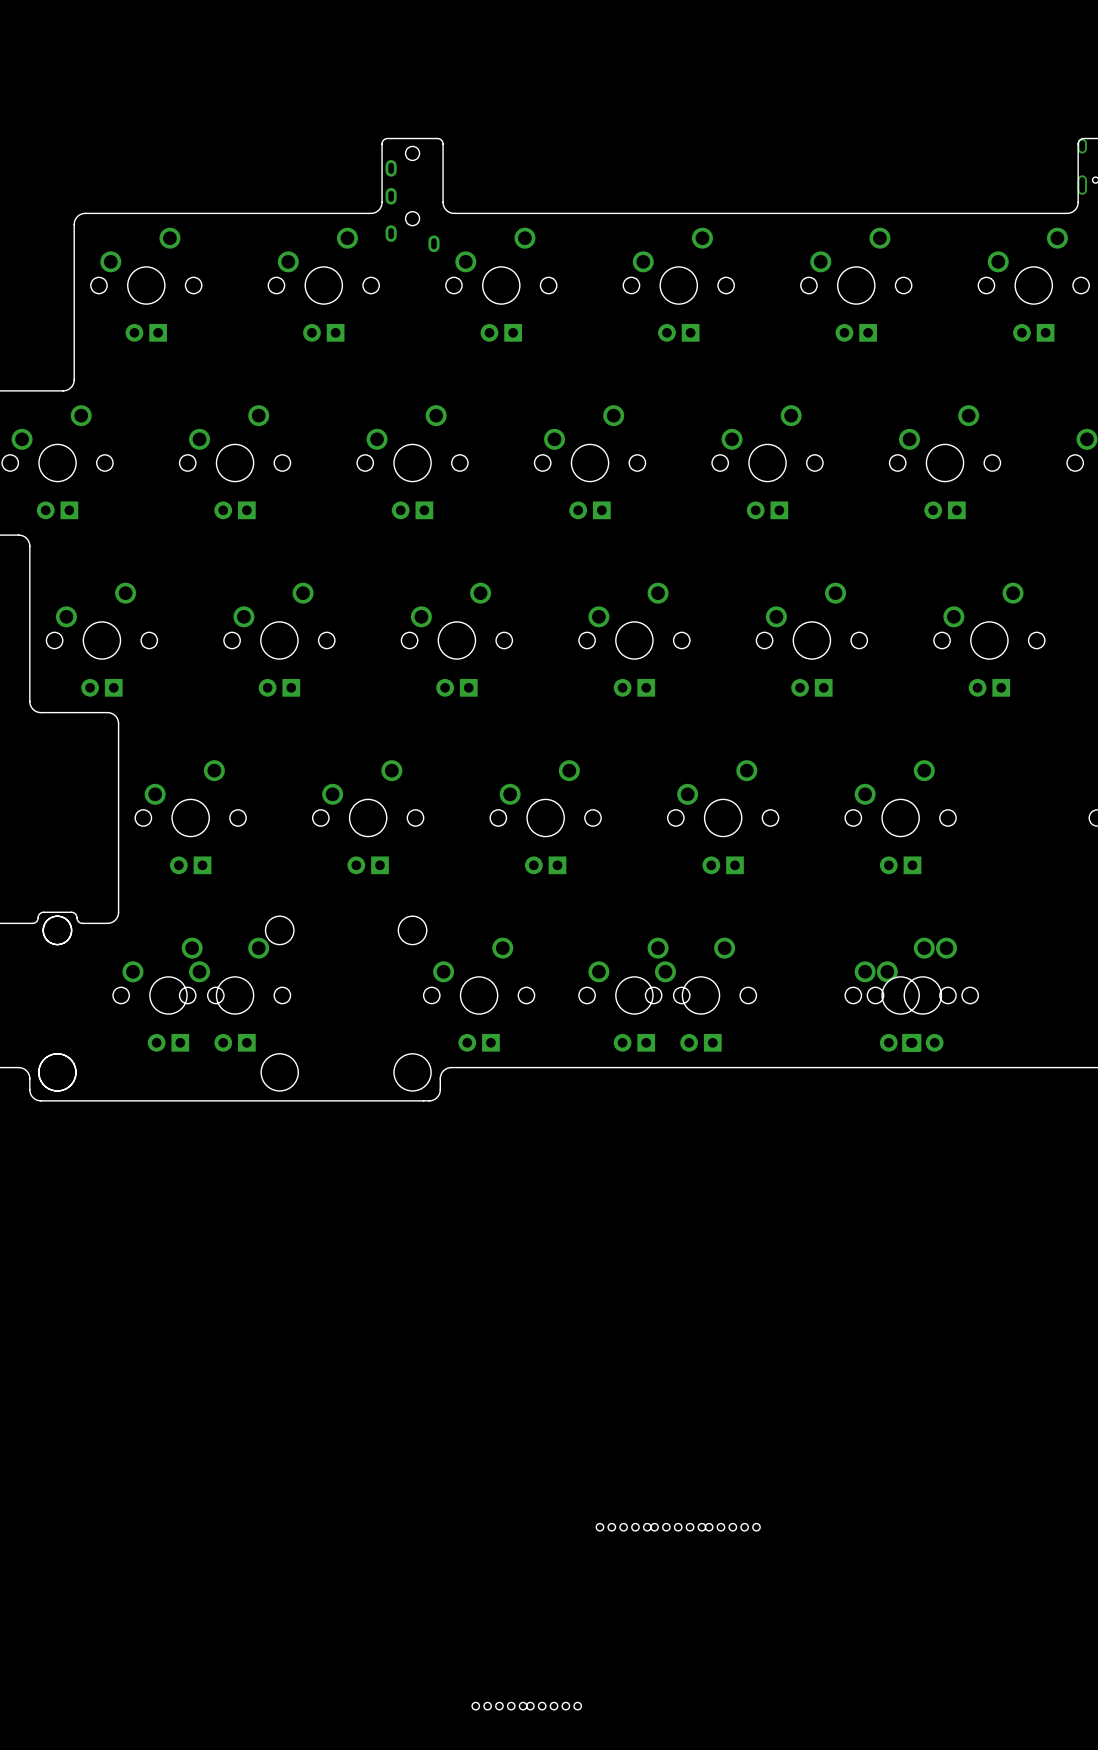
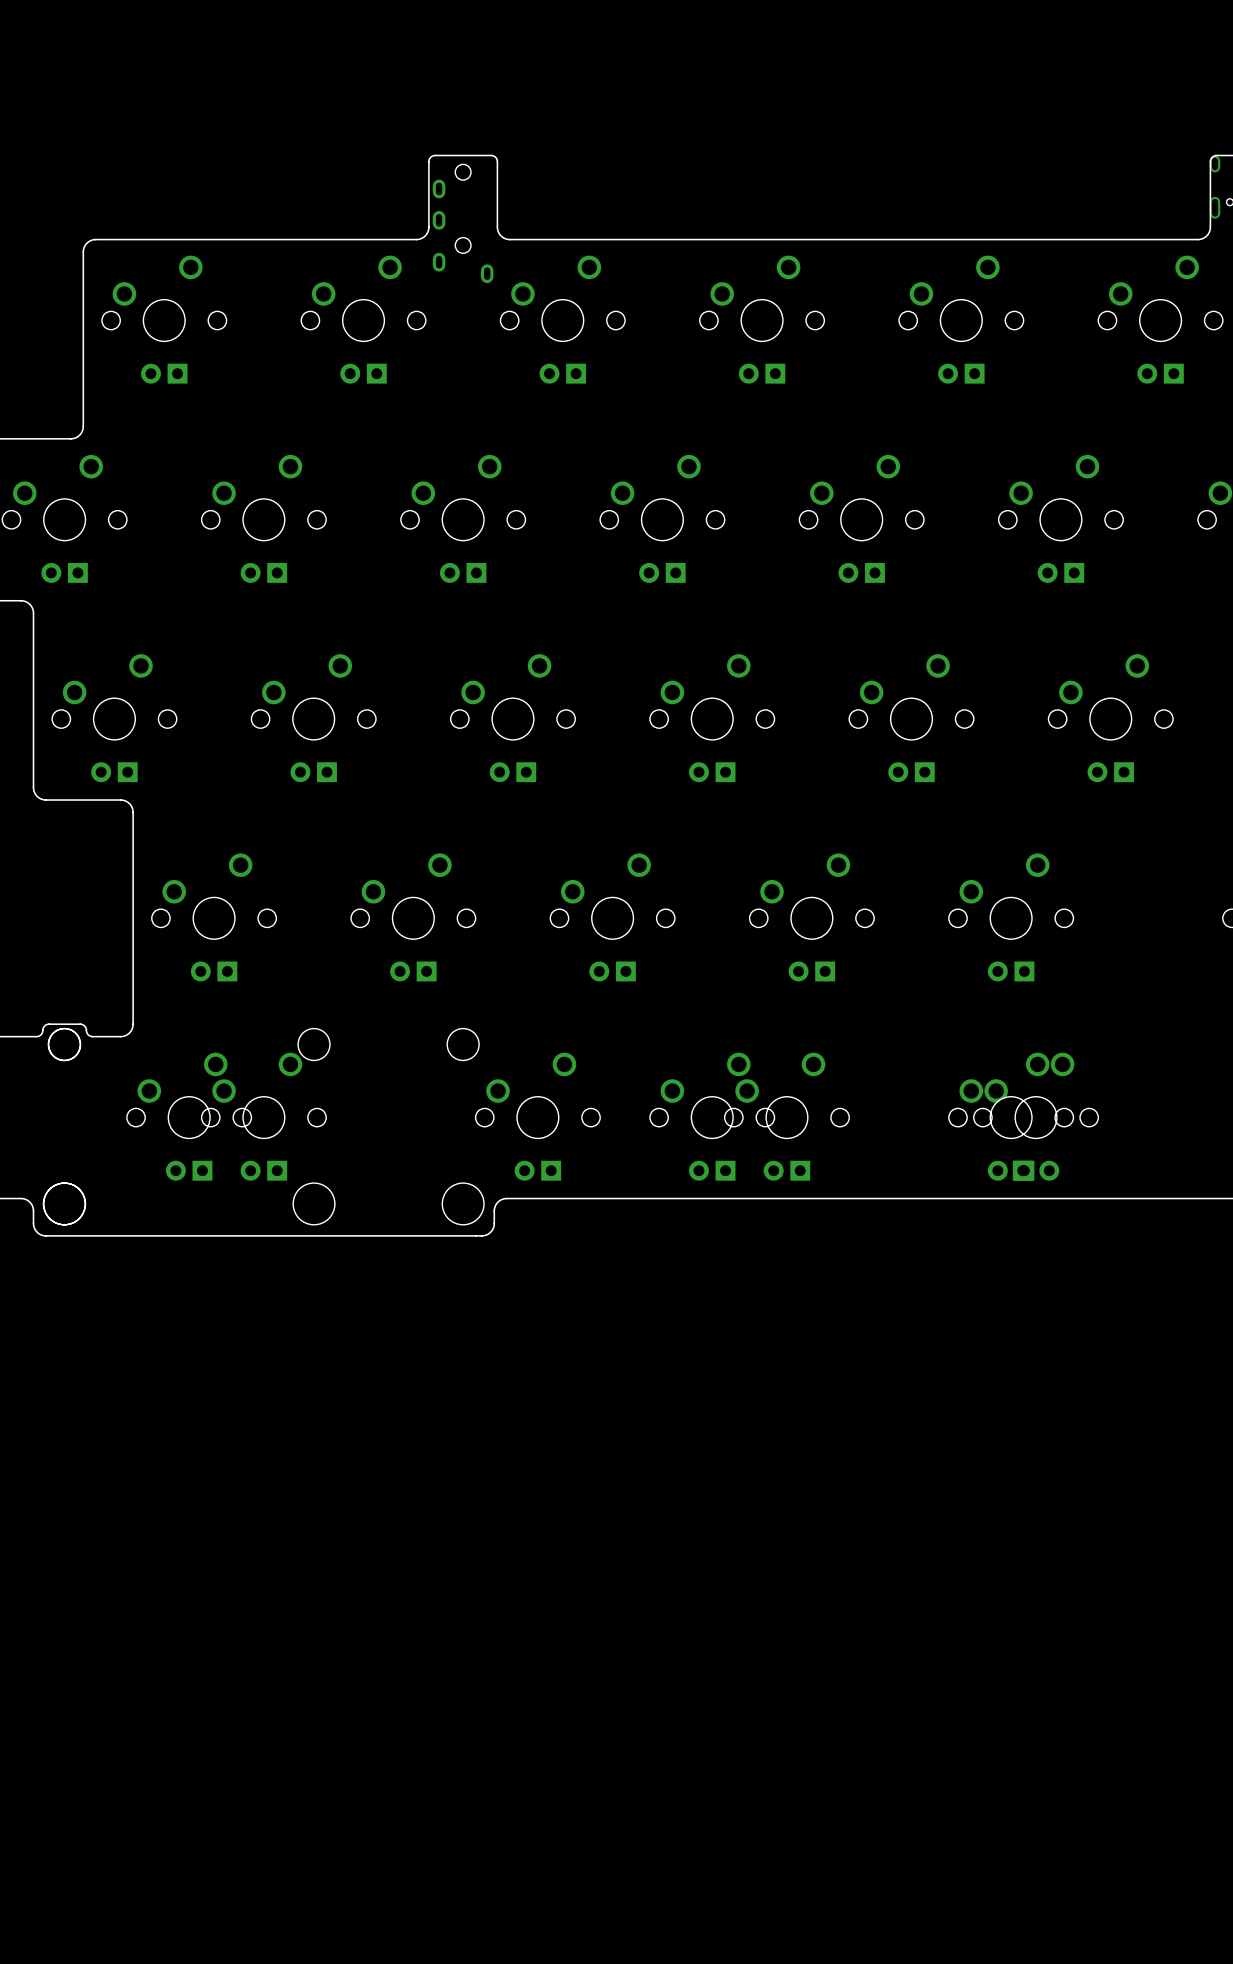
part: (623, 1527) -> none
part: (678, 1527) -> none
part: (732, 1527) -> none
part: (499, 1706) -> none
part: (554, 1706) -> none

